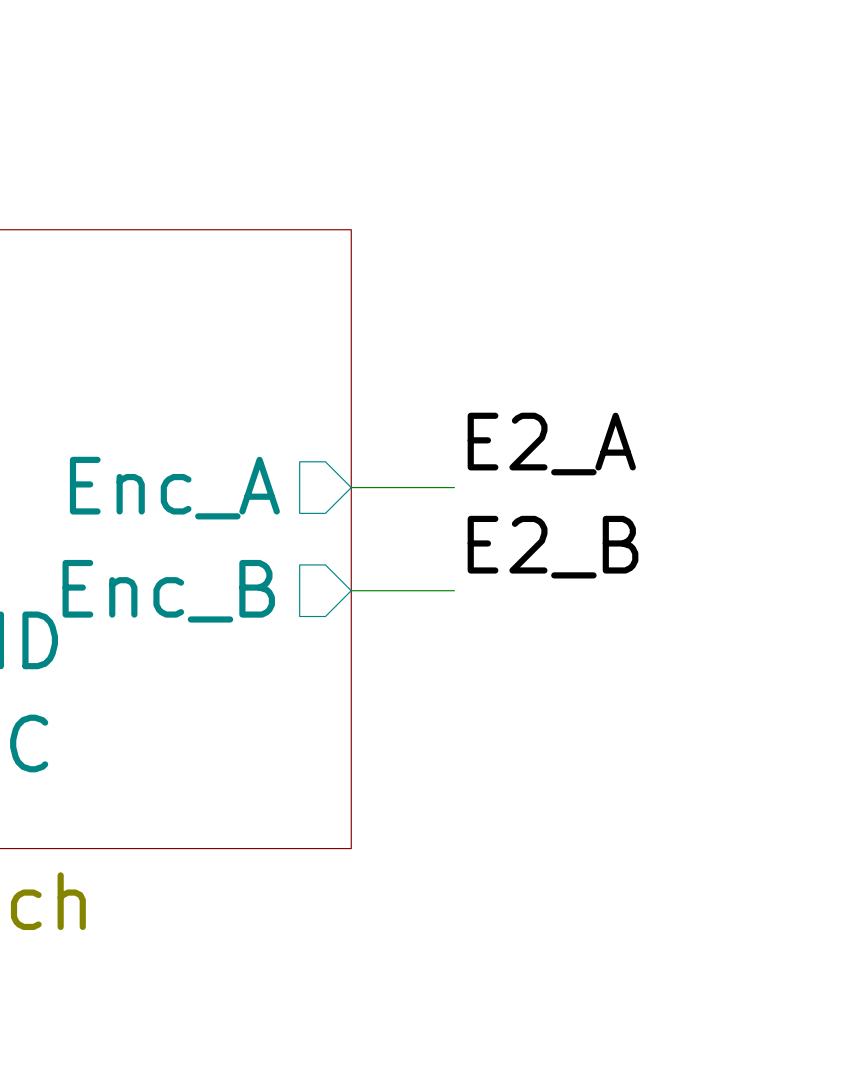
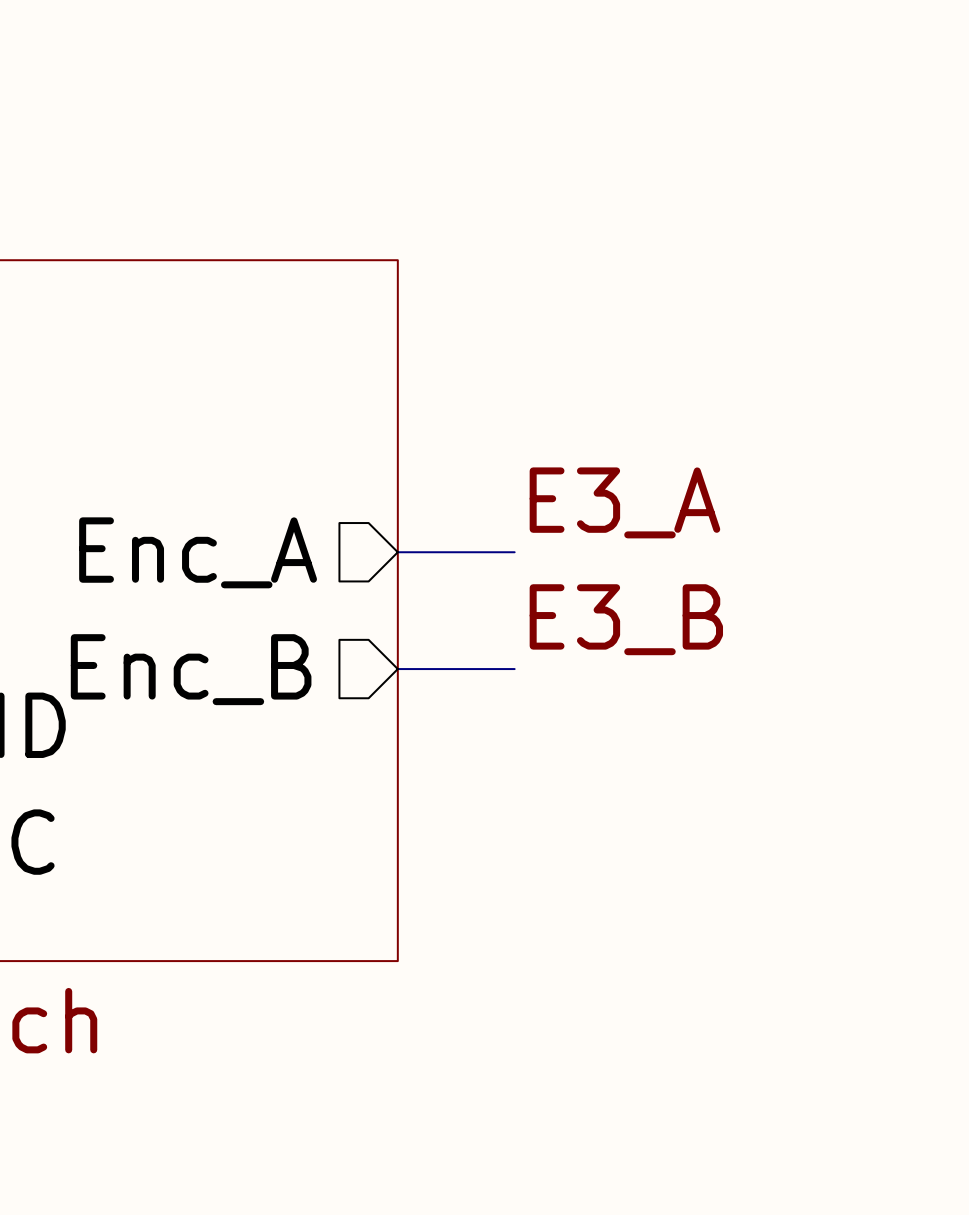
label: E2_A (551, 444) -> E3_A (624, 502)
label: E2_B (553, 547) -> E3_B (626, 619)

